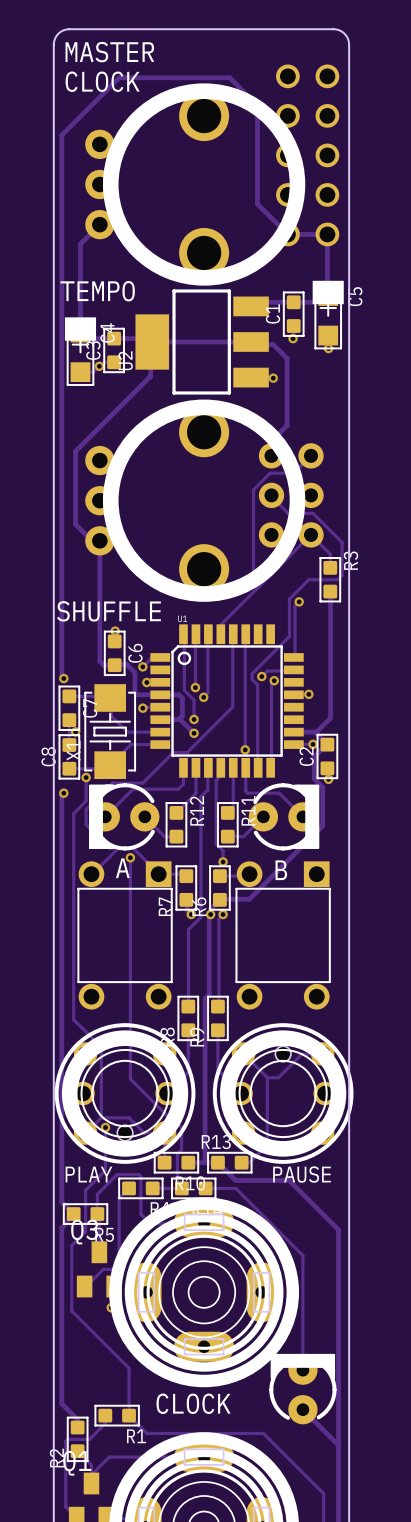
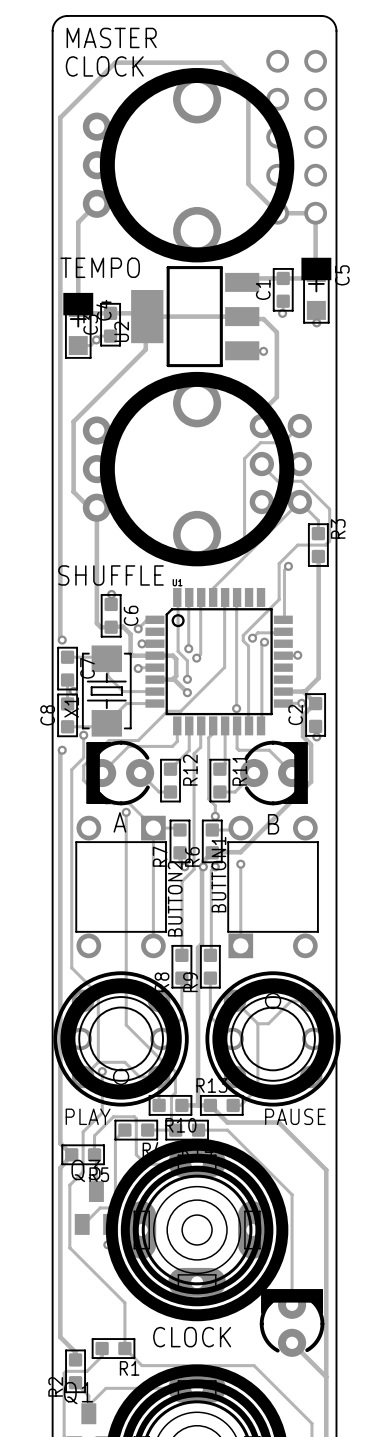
track: (117, 848) (91, 874) -> none
track: none -> (153, 828) (153, 945)
track: none -> (240, 864) (240, 945)
via: none -> (240, 864)
part: (283, 935) -> none
BUTTON1: none -> (273, 886)
BUTTON2 name: none -> BUTTON2 (175, 898)

